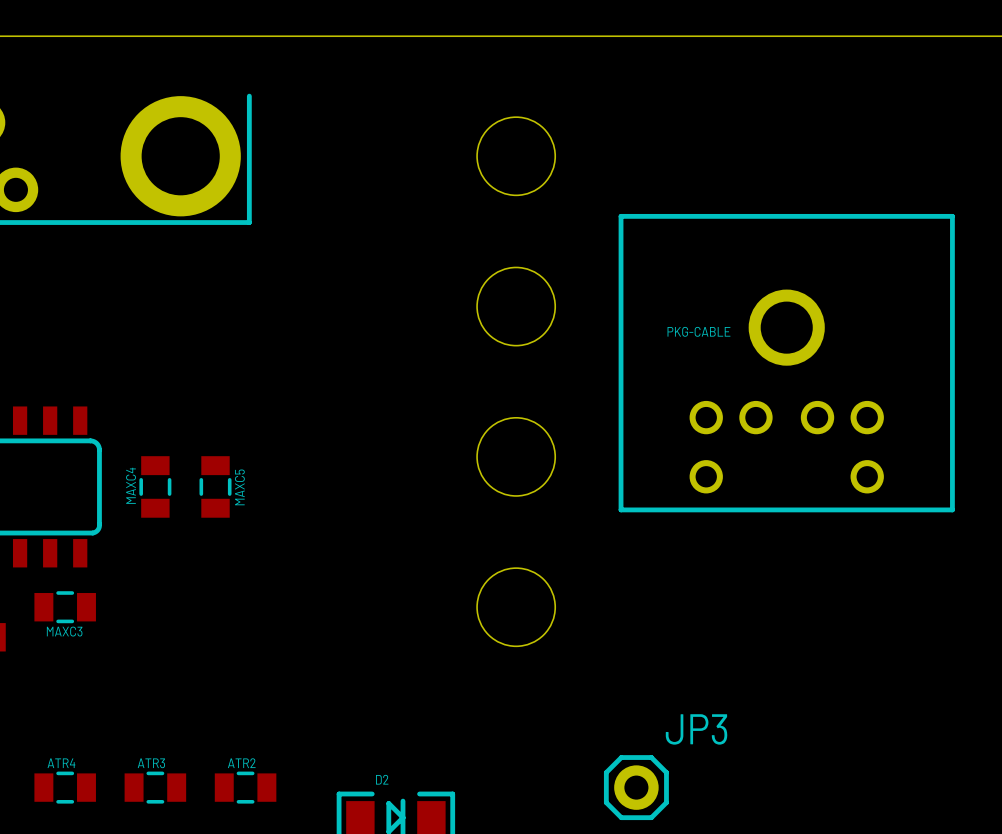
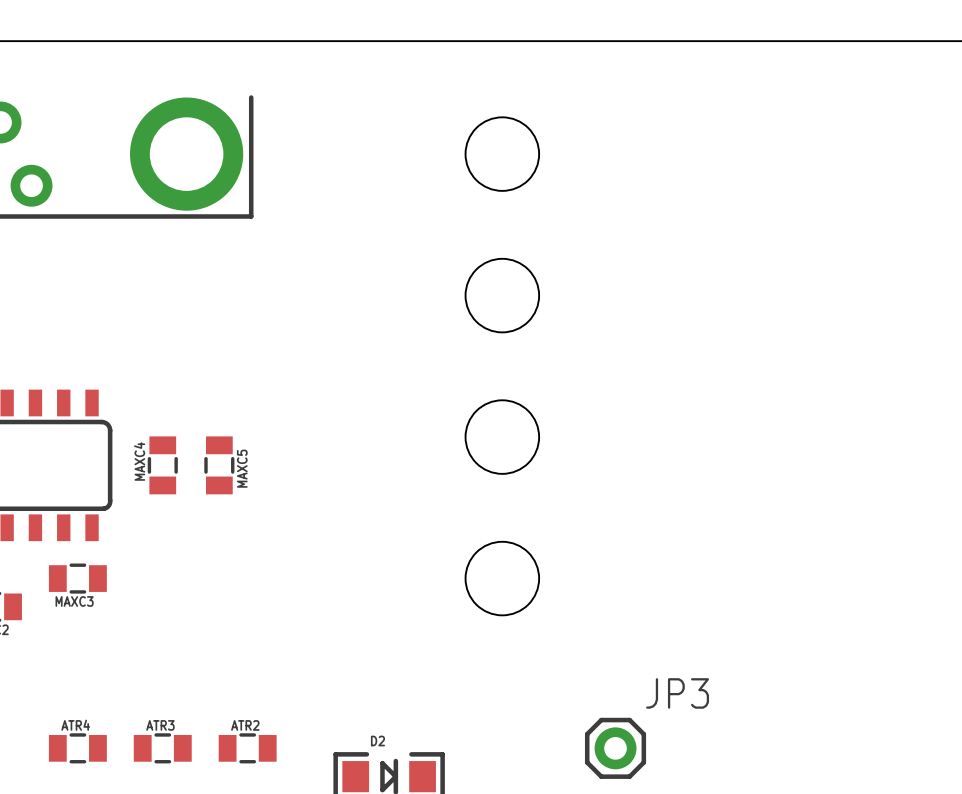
PKG-CABLE: (786, 363) -> none

